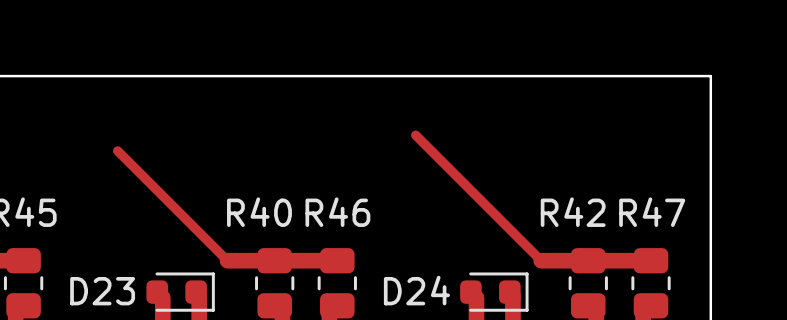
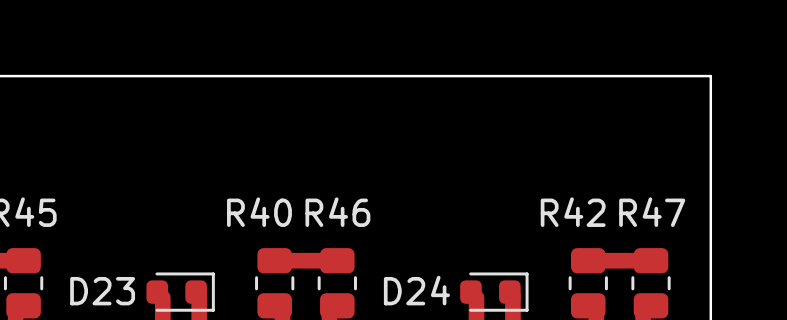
top track: (415, 135) (541, 260) (588, 260) -> none
top track: (117, 150) (227, 260) (274, 260) -> none

